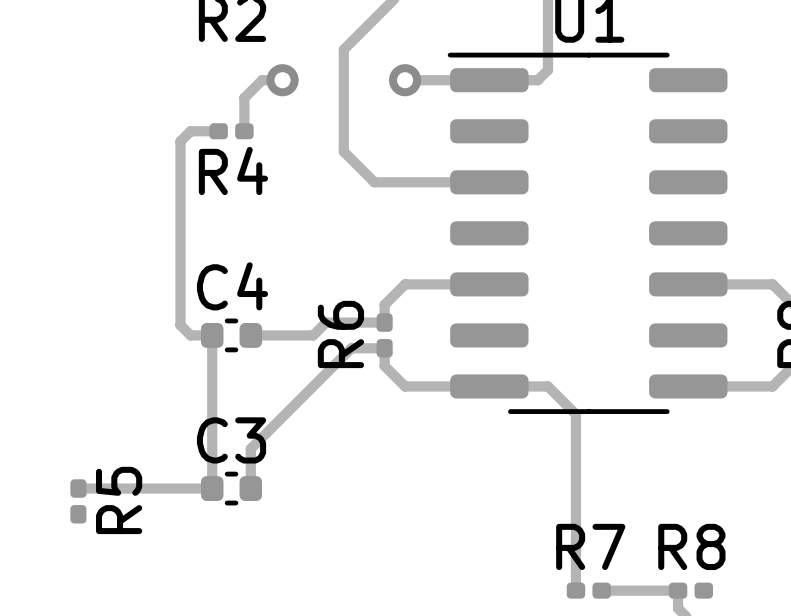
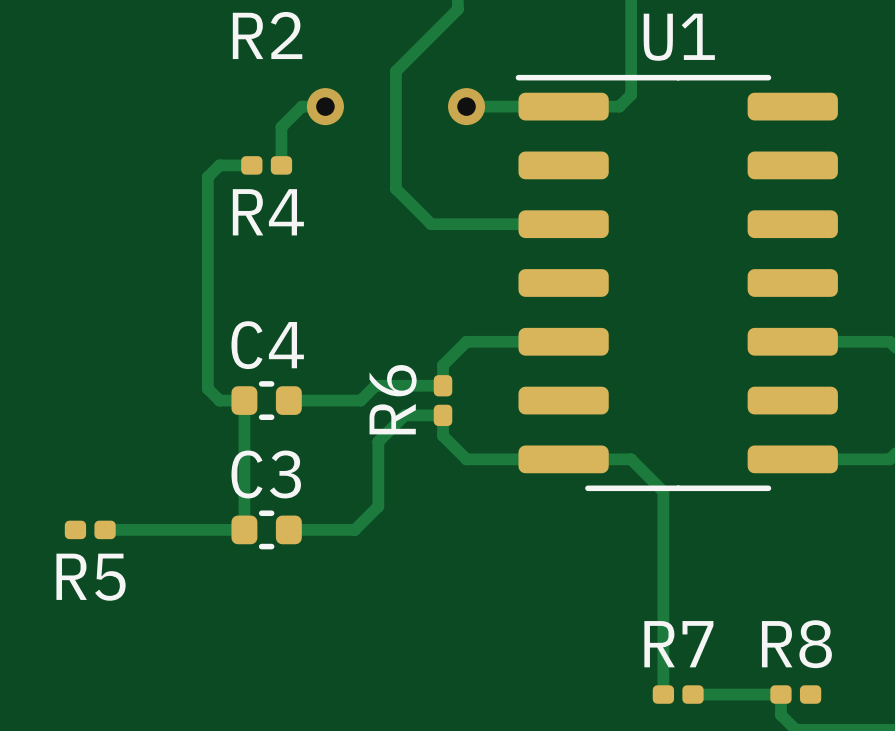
track: (328, 371) (250, 448) (250, 488) -> (378, 441) (378, 506) (354, 529) (288, 529)
track: (212, 447) (212, 488) (78, 488) -> (244, 529) (105, 529)
C3 position: (231, 488) -> (266, 529)
R5 rotation: 0° (78, 501) -> 90° clockwise (90, 529)
R5 position: (78, 501) -> (90, 529)

